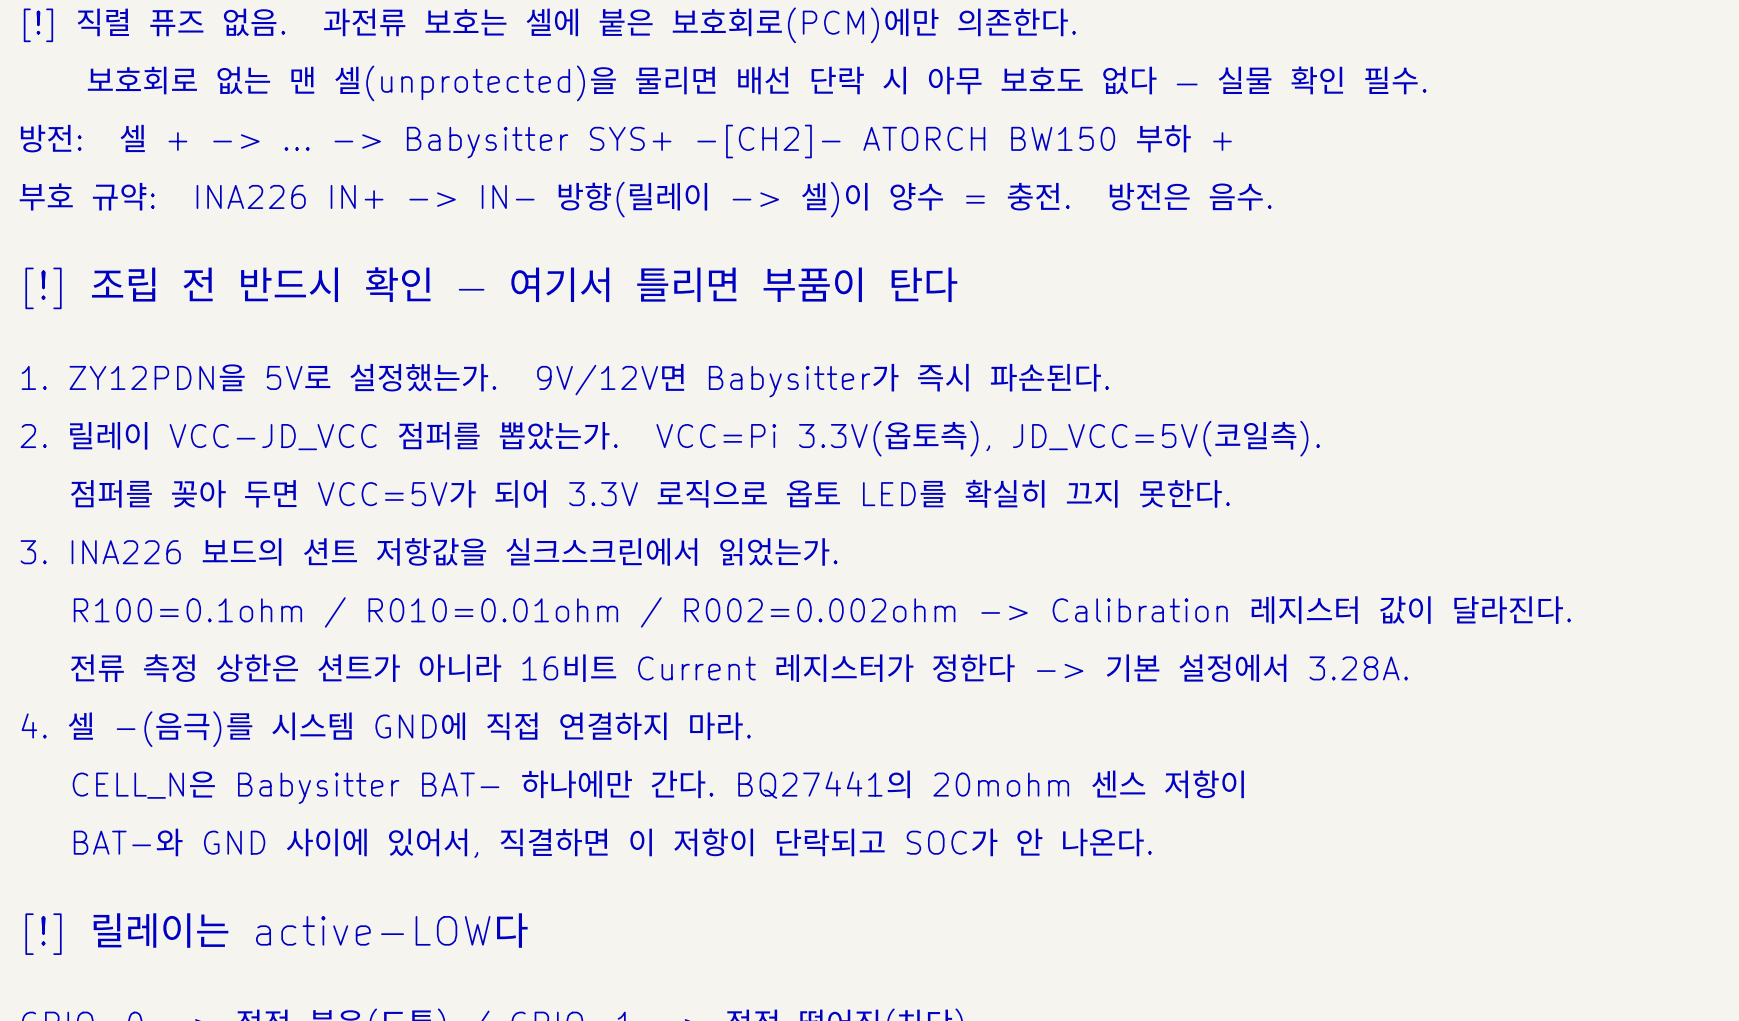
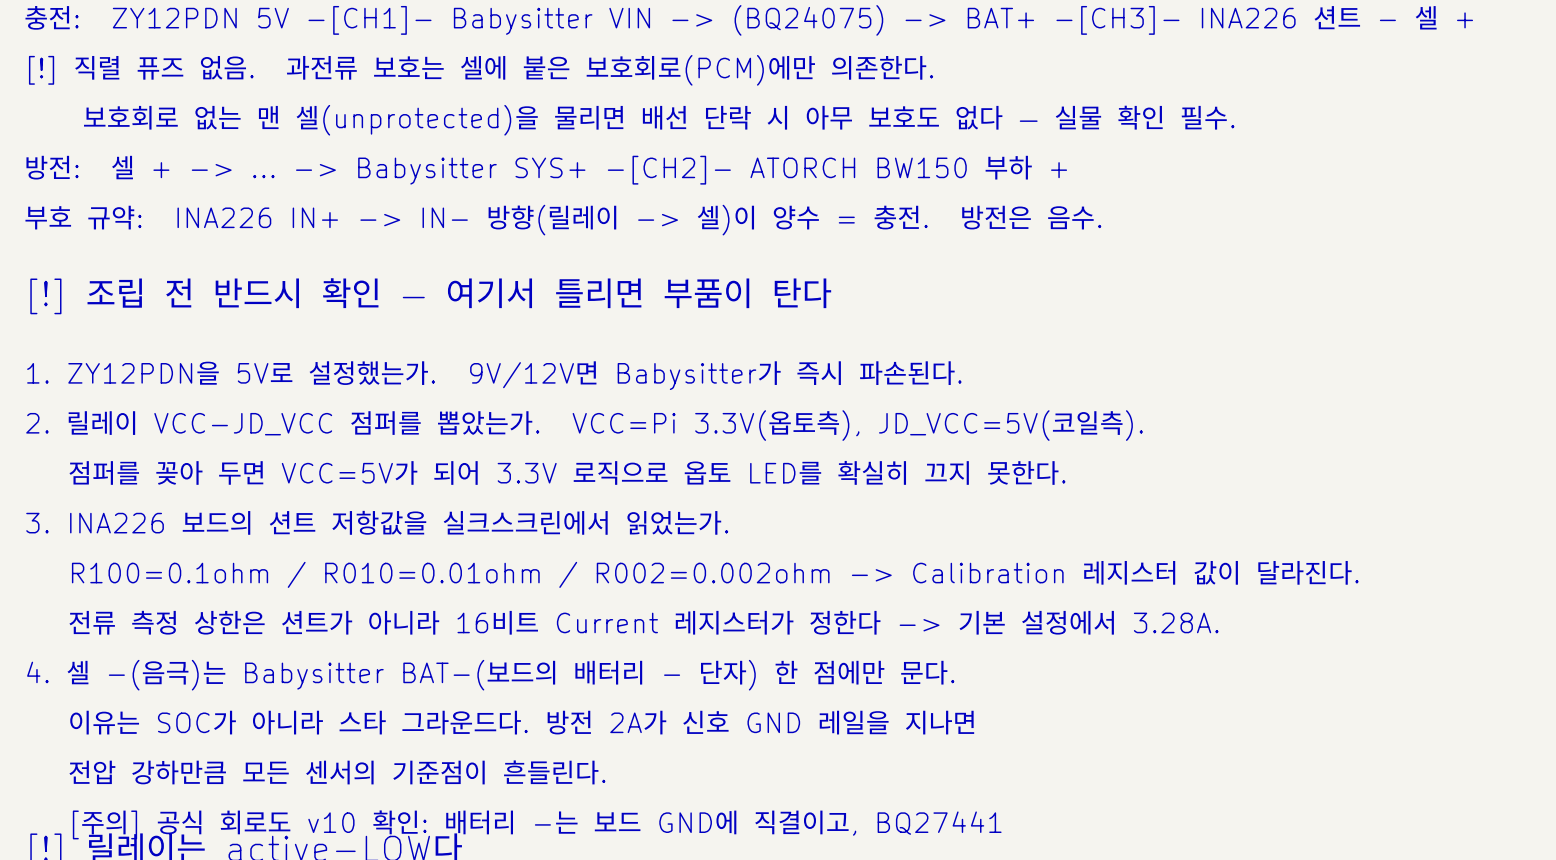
text: 4. 셀 -(음극)를 시스템 GND에 직접 연결하지 마라. (386, 729) -> 4. 셀 -(음극)는 Babysitter BAT-(보드의 배터리 - 단자) 한 점에만 문다. (490, 675)
text: CELL_N은 Babysitter BAT- 하나에만 간다. BQ27441의 20mohm 센스 저항이 (658, 786) -> 이유는 SOC가 아니라 스타 그라운드다. 방전 2A가 신호 GND 레일을 지나면 (522, 722)
text: BAT-와 GND 사이에 있어서, 직결하면 이 저항이 단락되고 SOC가 안 나온다. (612, 842) -> 전압 강하만큼 모든 센서의 기준점이 흔들린다. (337, 772)
text: none -> [주의] 공식 회로도 v10 확인: 배터리 -는 보드 GND에 직결이고, BQ27441 (537, 824)

